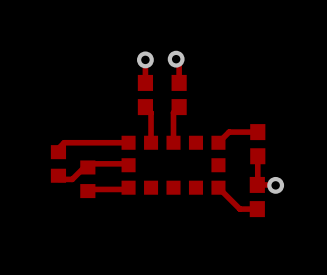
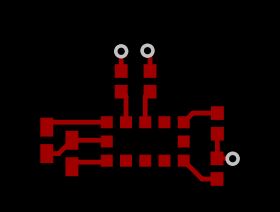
part footprint: [50, 145, 67, 183] -> [40, 117, 54, 164]
part footprint: [80, 160, 96, 199] -> [65, 130, 79, 177]

